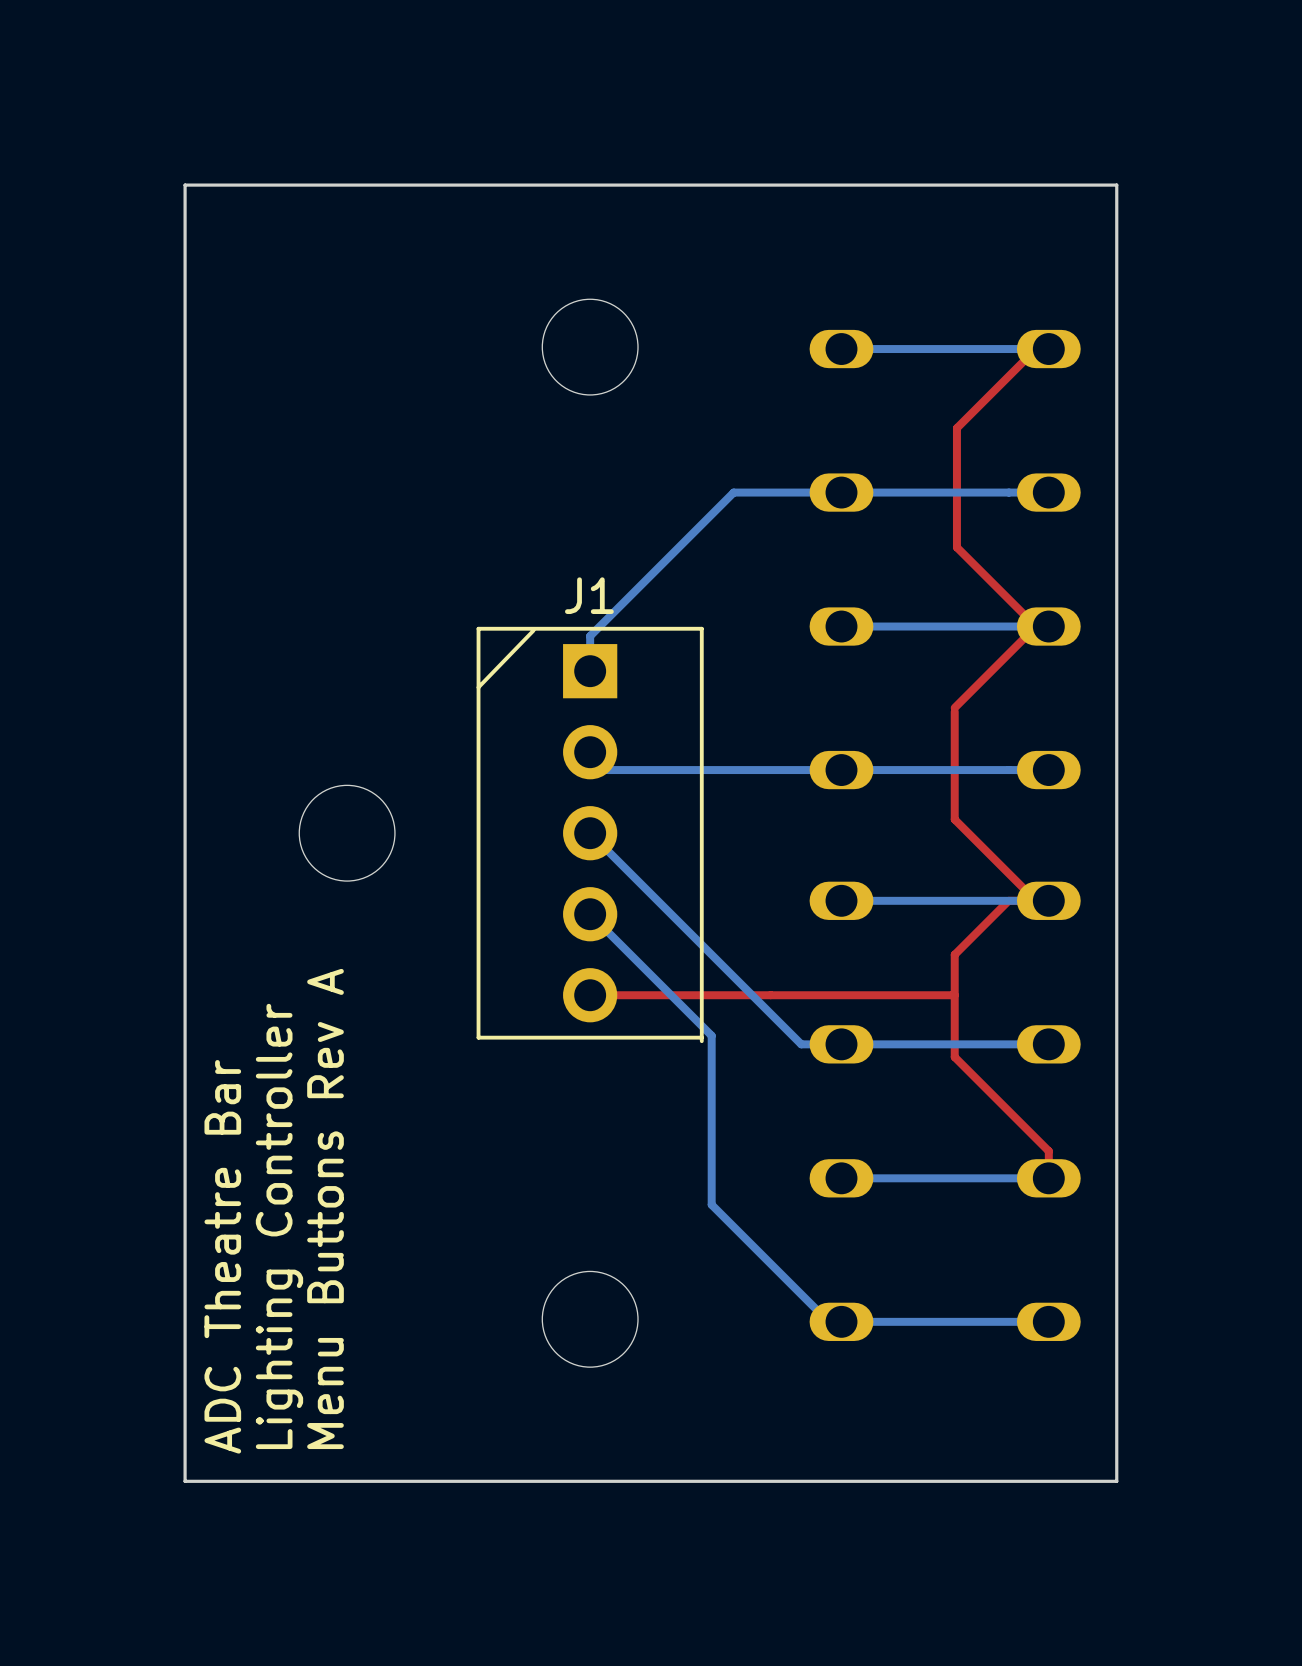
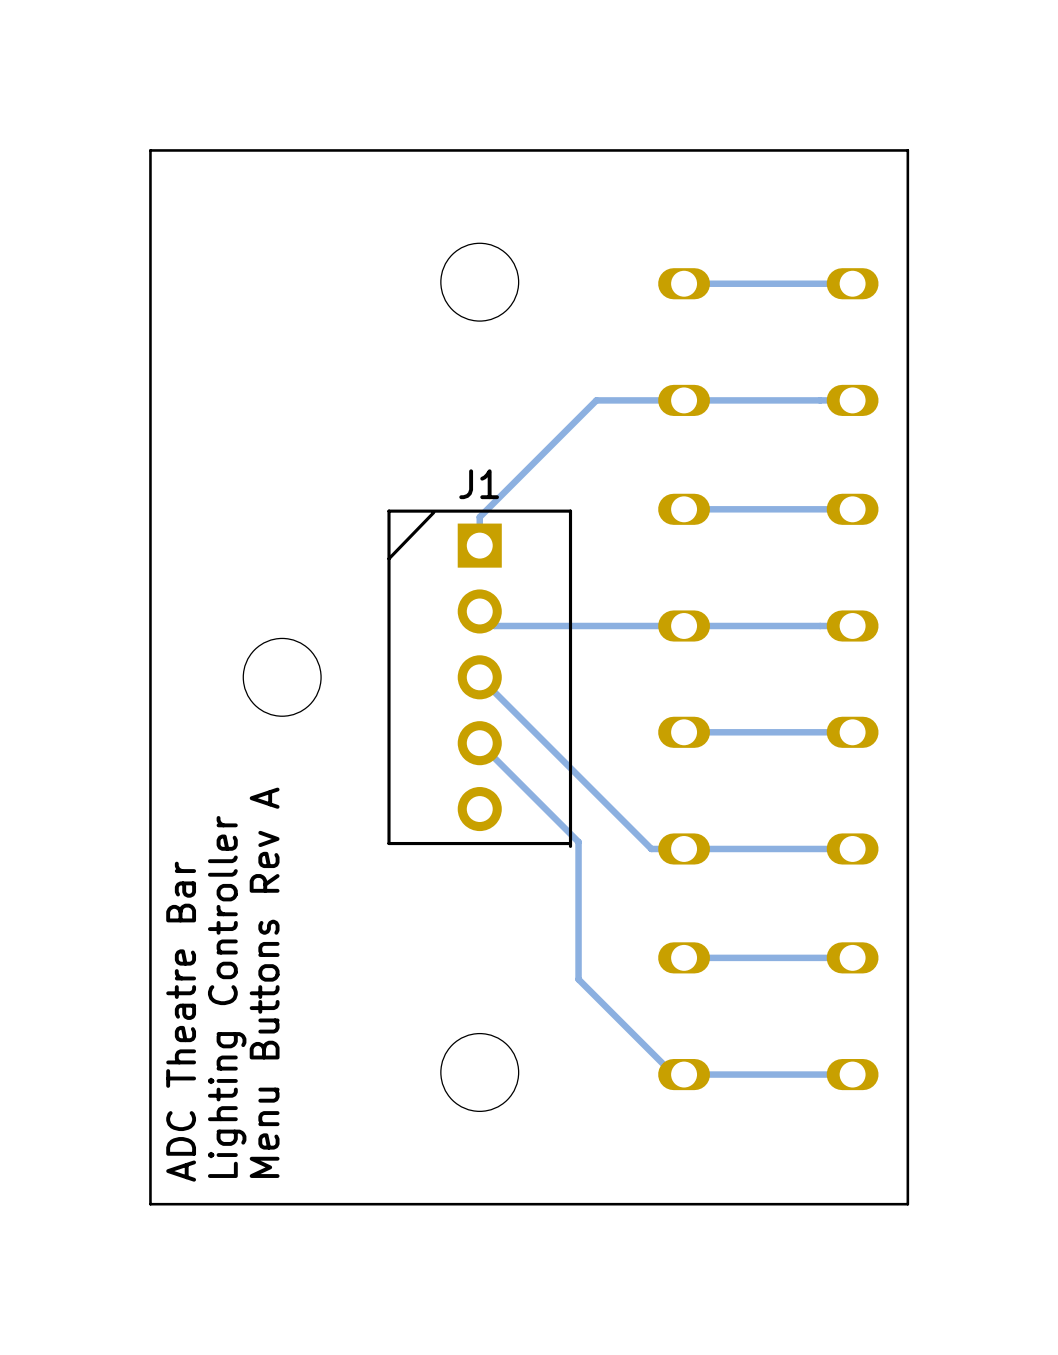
top track: (1036, 349) (956, 428) (956, 547) (1036, 626) (954, 707) -> none
top track: (954, 711) (954, 819) (1036, 900) (1008, 900) (954, 954) (954, 1057) (1048, 1151) (1048, 1178) -> none
top track: (954, 995) (590, 995) -> none

